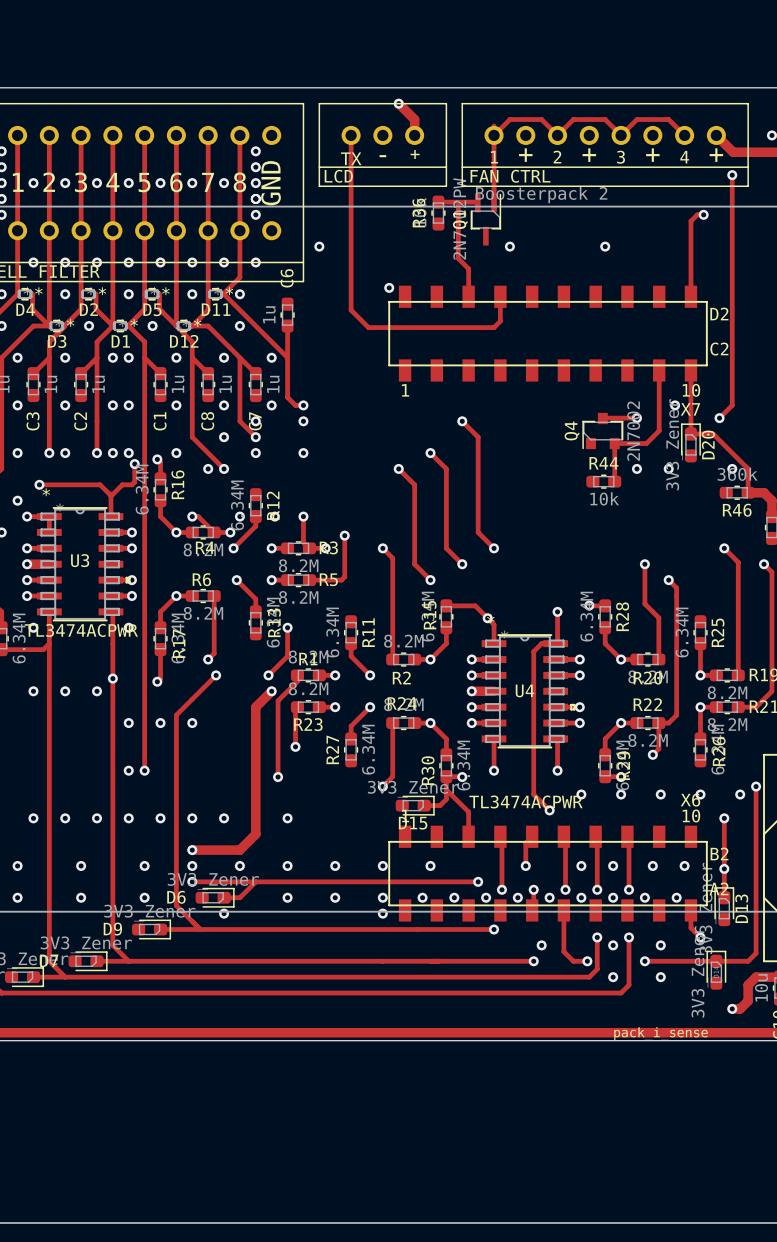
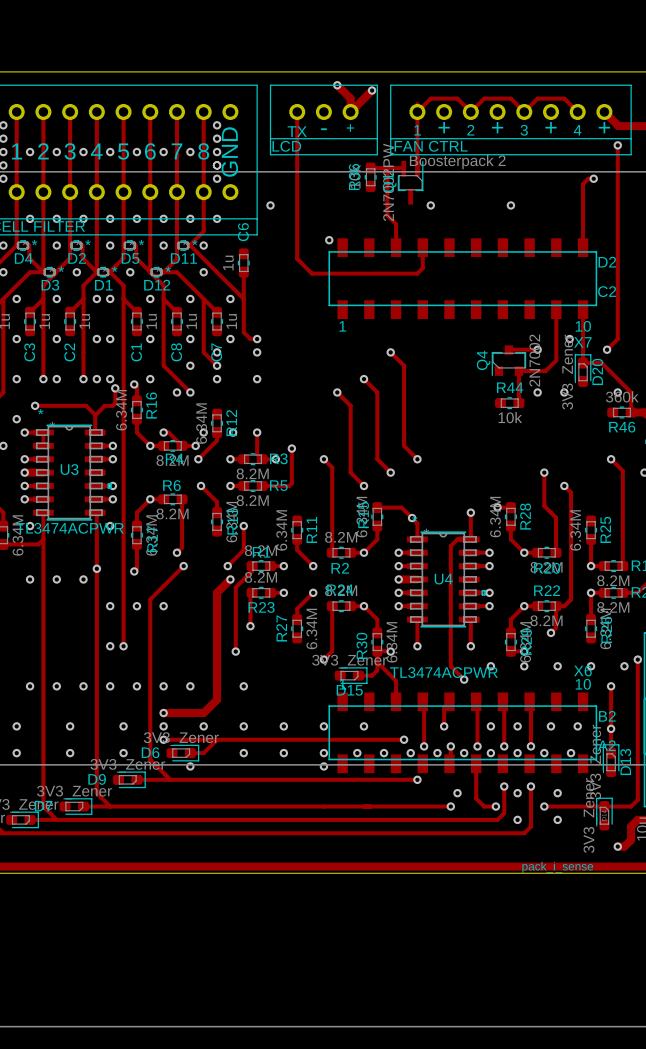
track: none -> (372, 90) (350, 111)
via: none -> (372, 90)
track: (690, 910) (690, 927) (700, 937) -> none
via: (700, 937) -> none

